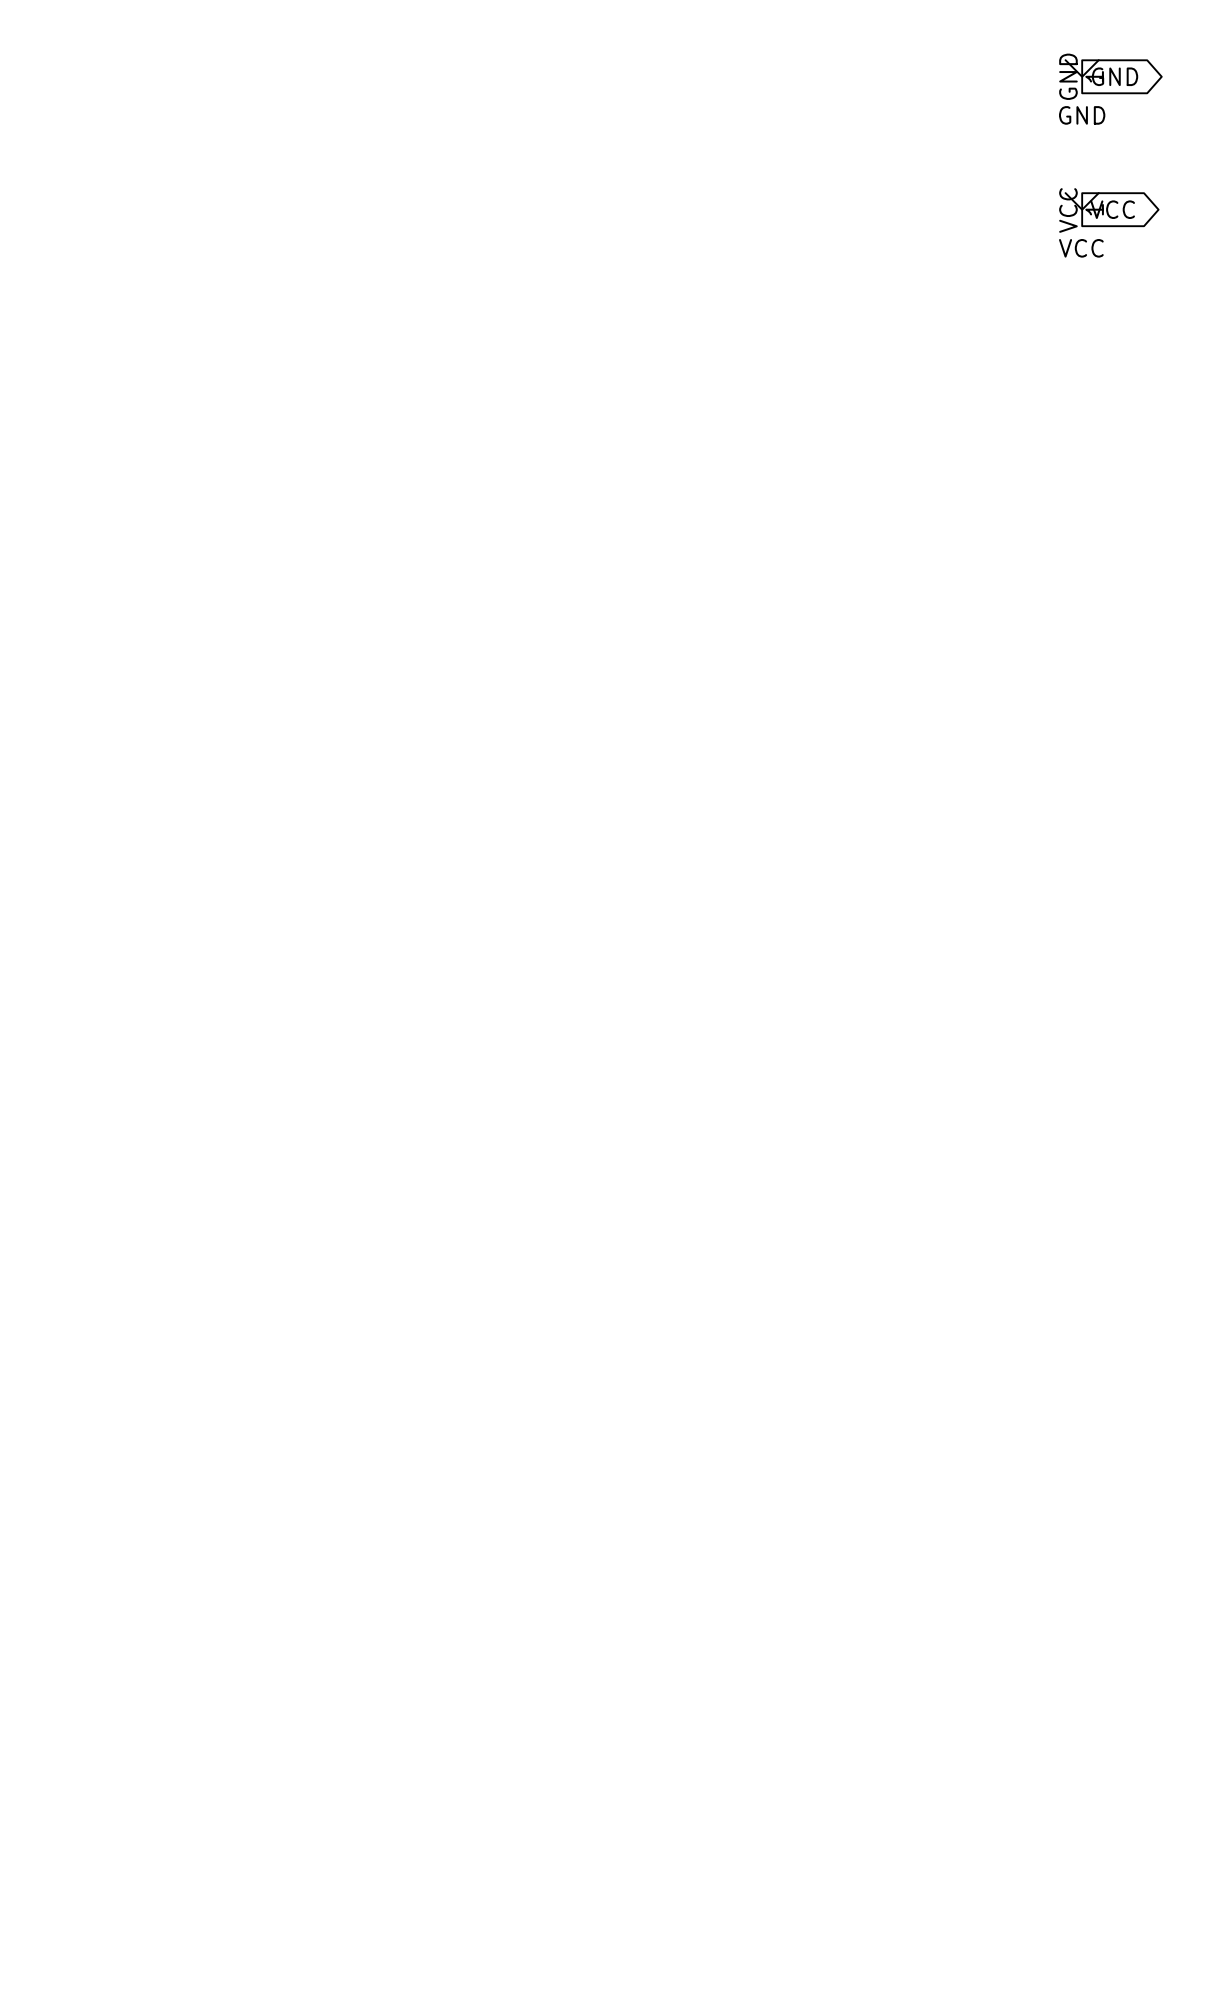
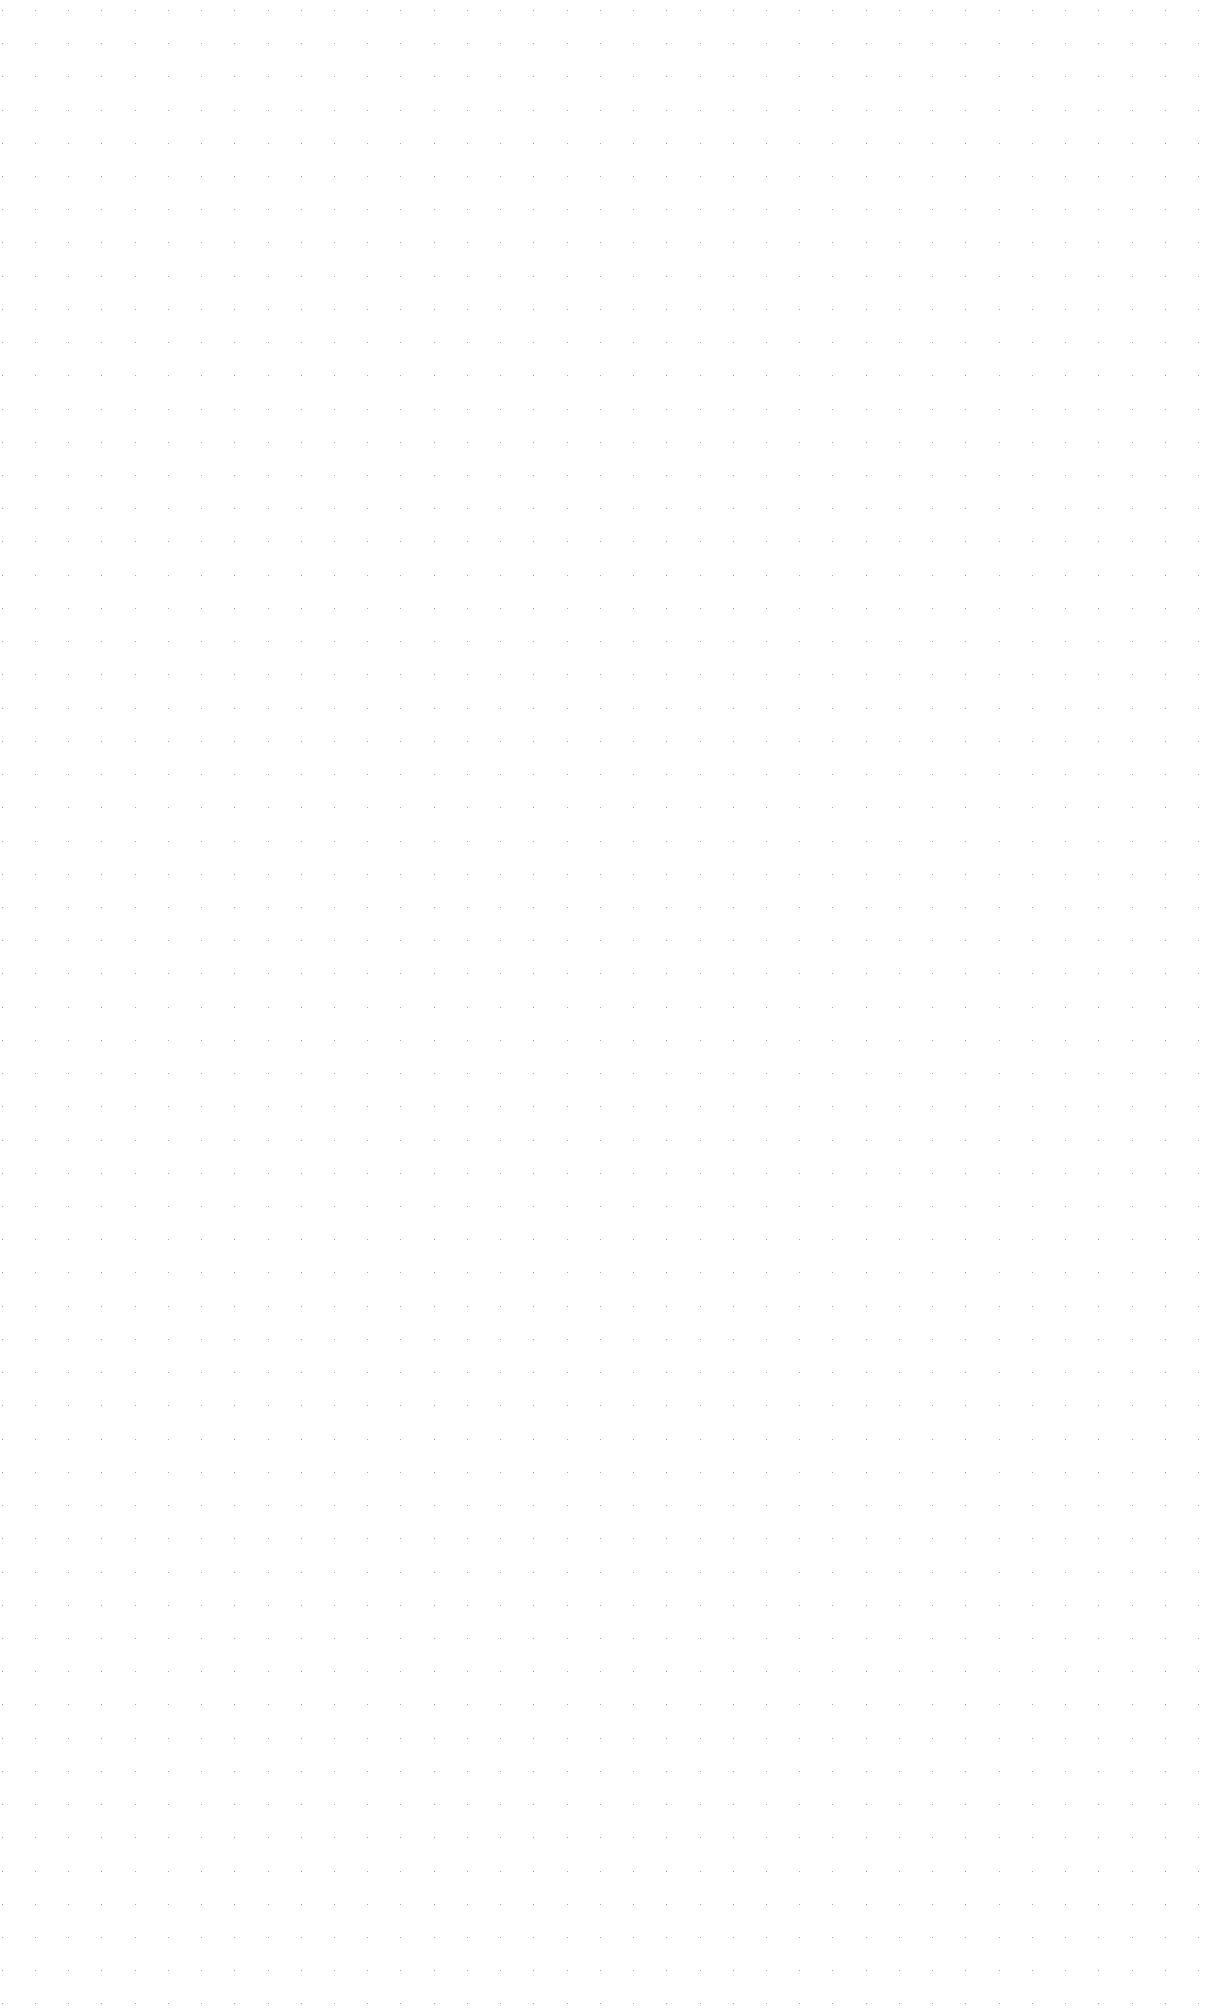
power symbol: GND (1082, 68) -> none
global label: GND (1115, 76) -> none
power symbol: VCC (1082, 201) -> none
global label: VCC (1112, 209) -> none

